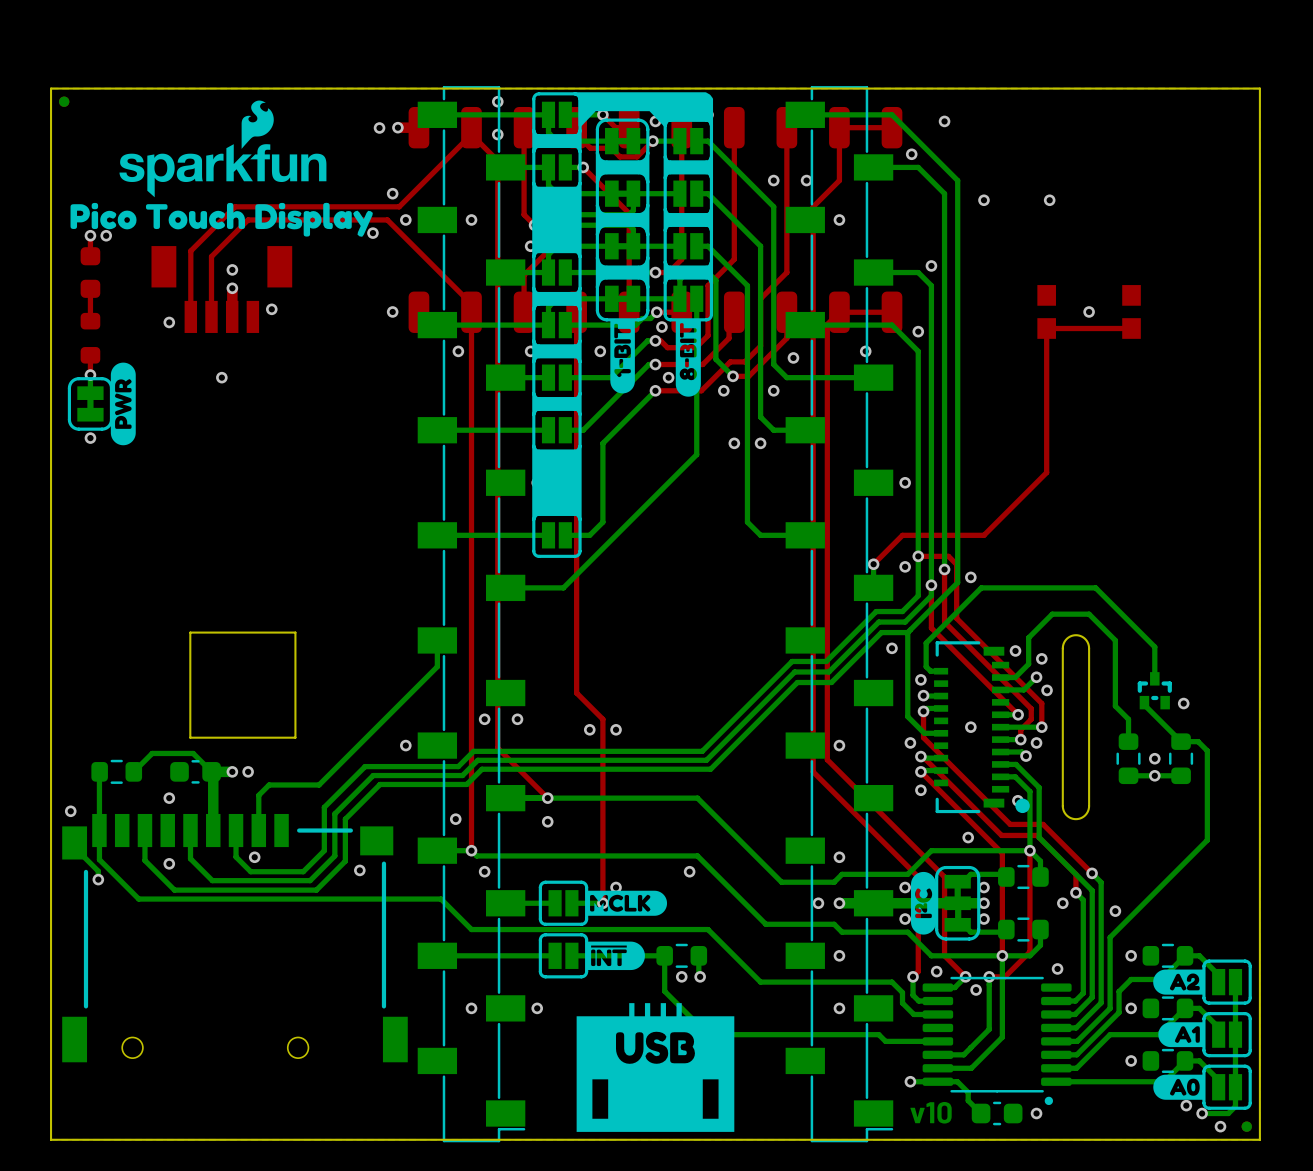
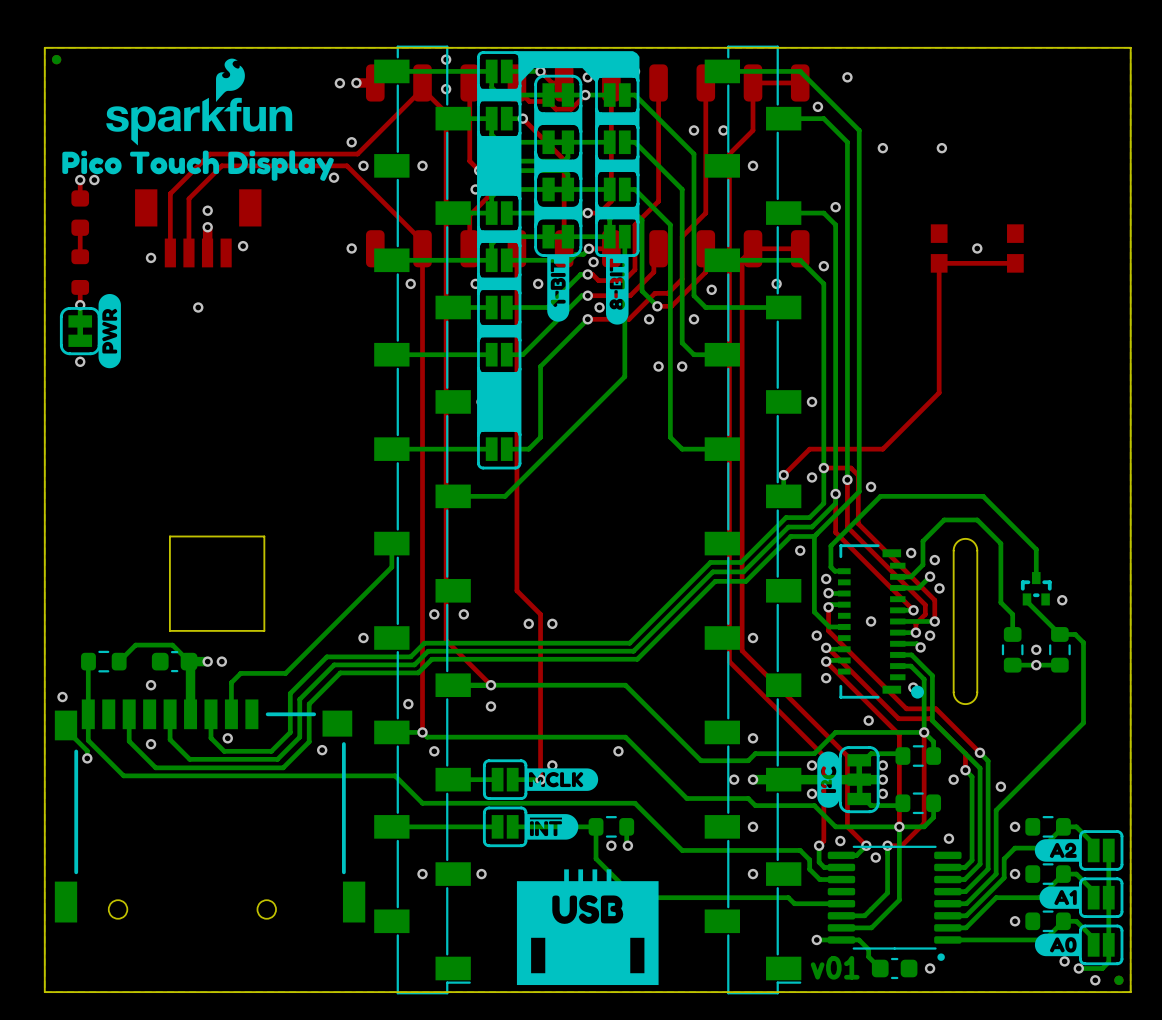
text: v10 (931, 1112) -> v01 (835, 967)

